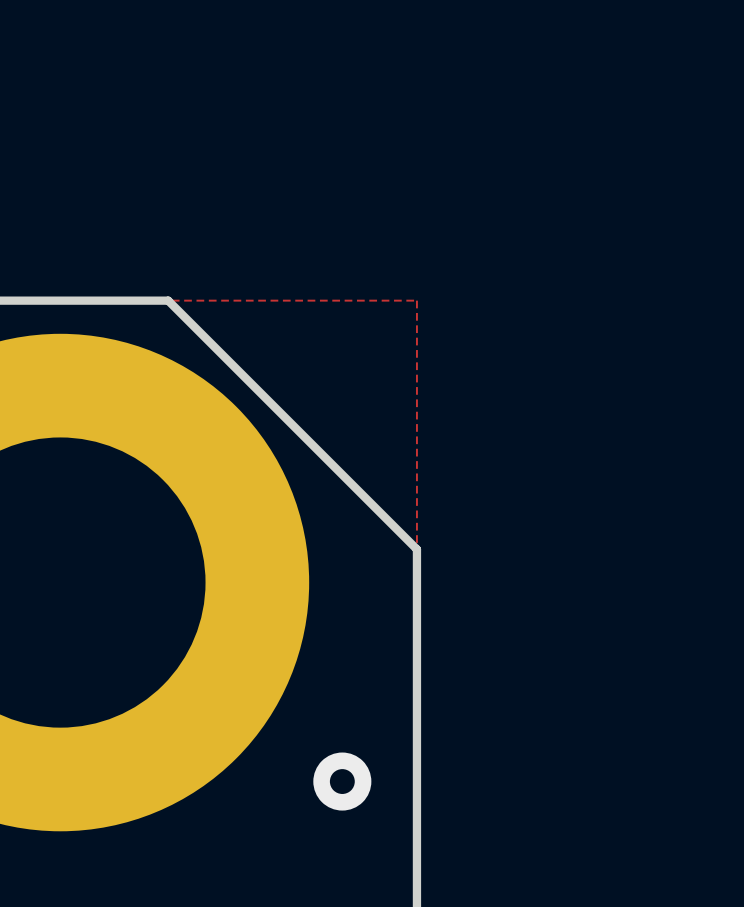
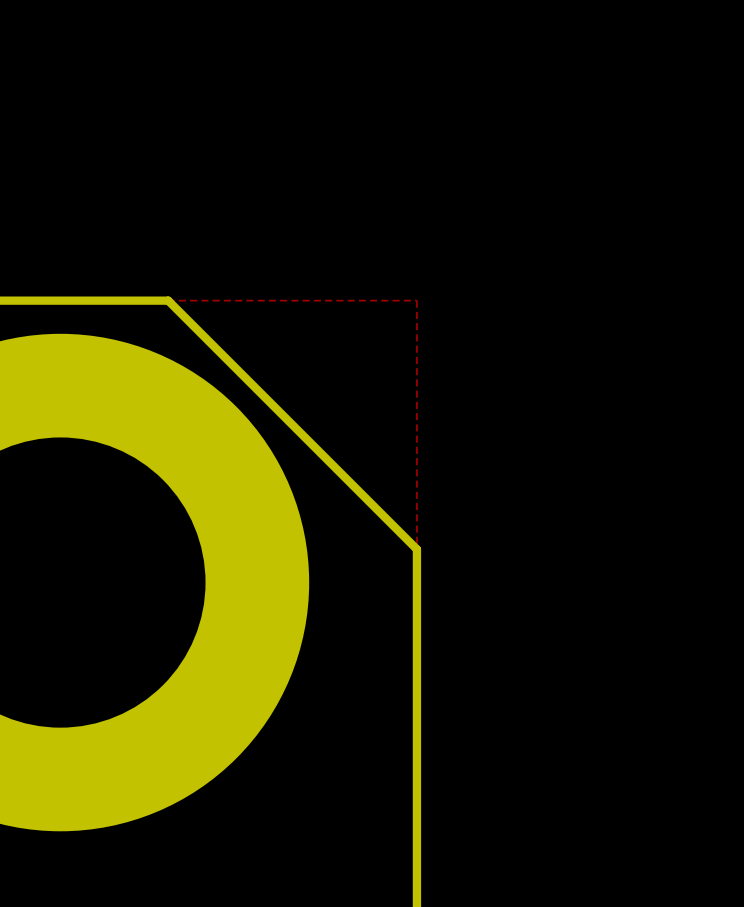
via: (342, 781) -> none

